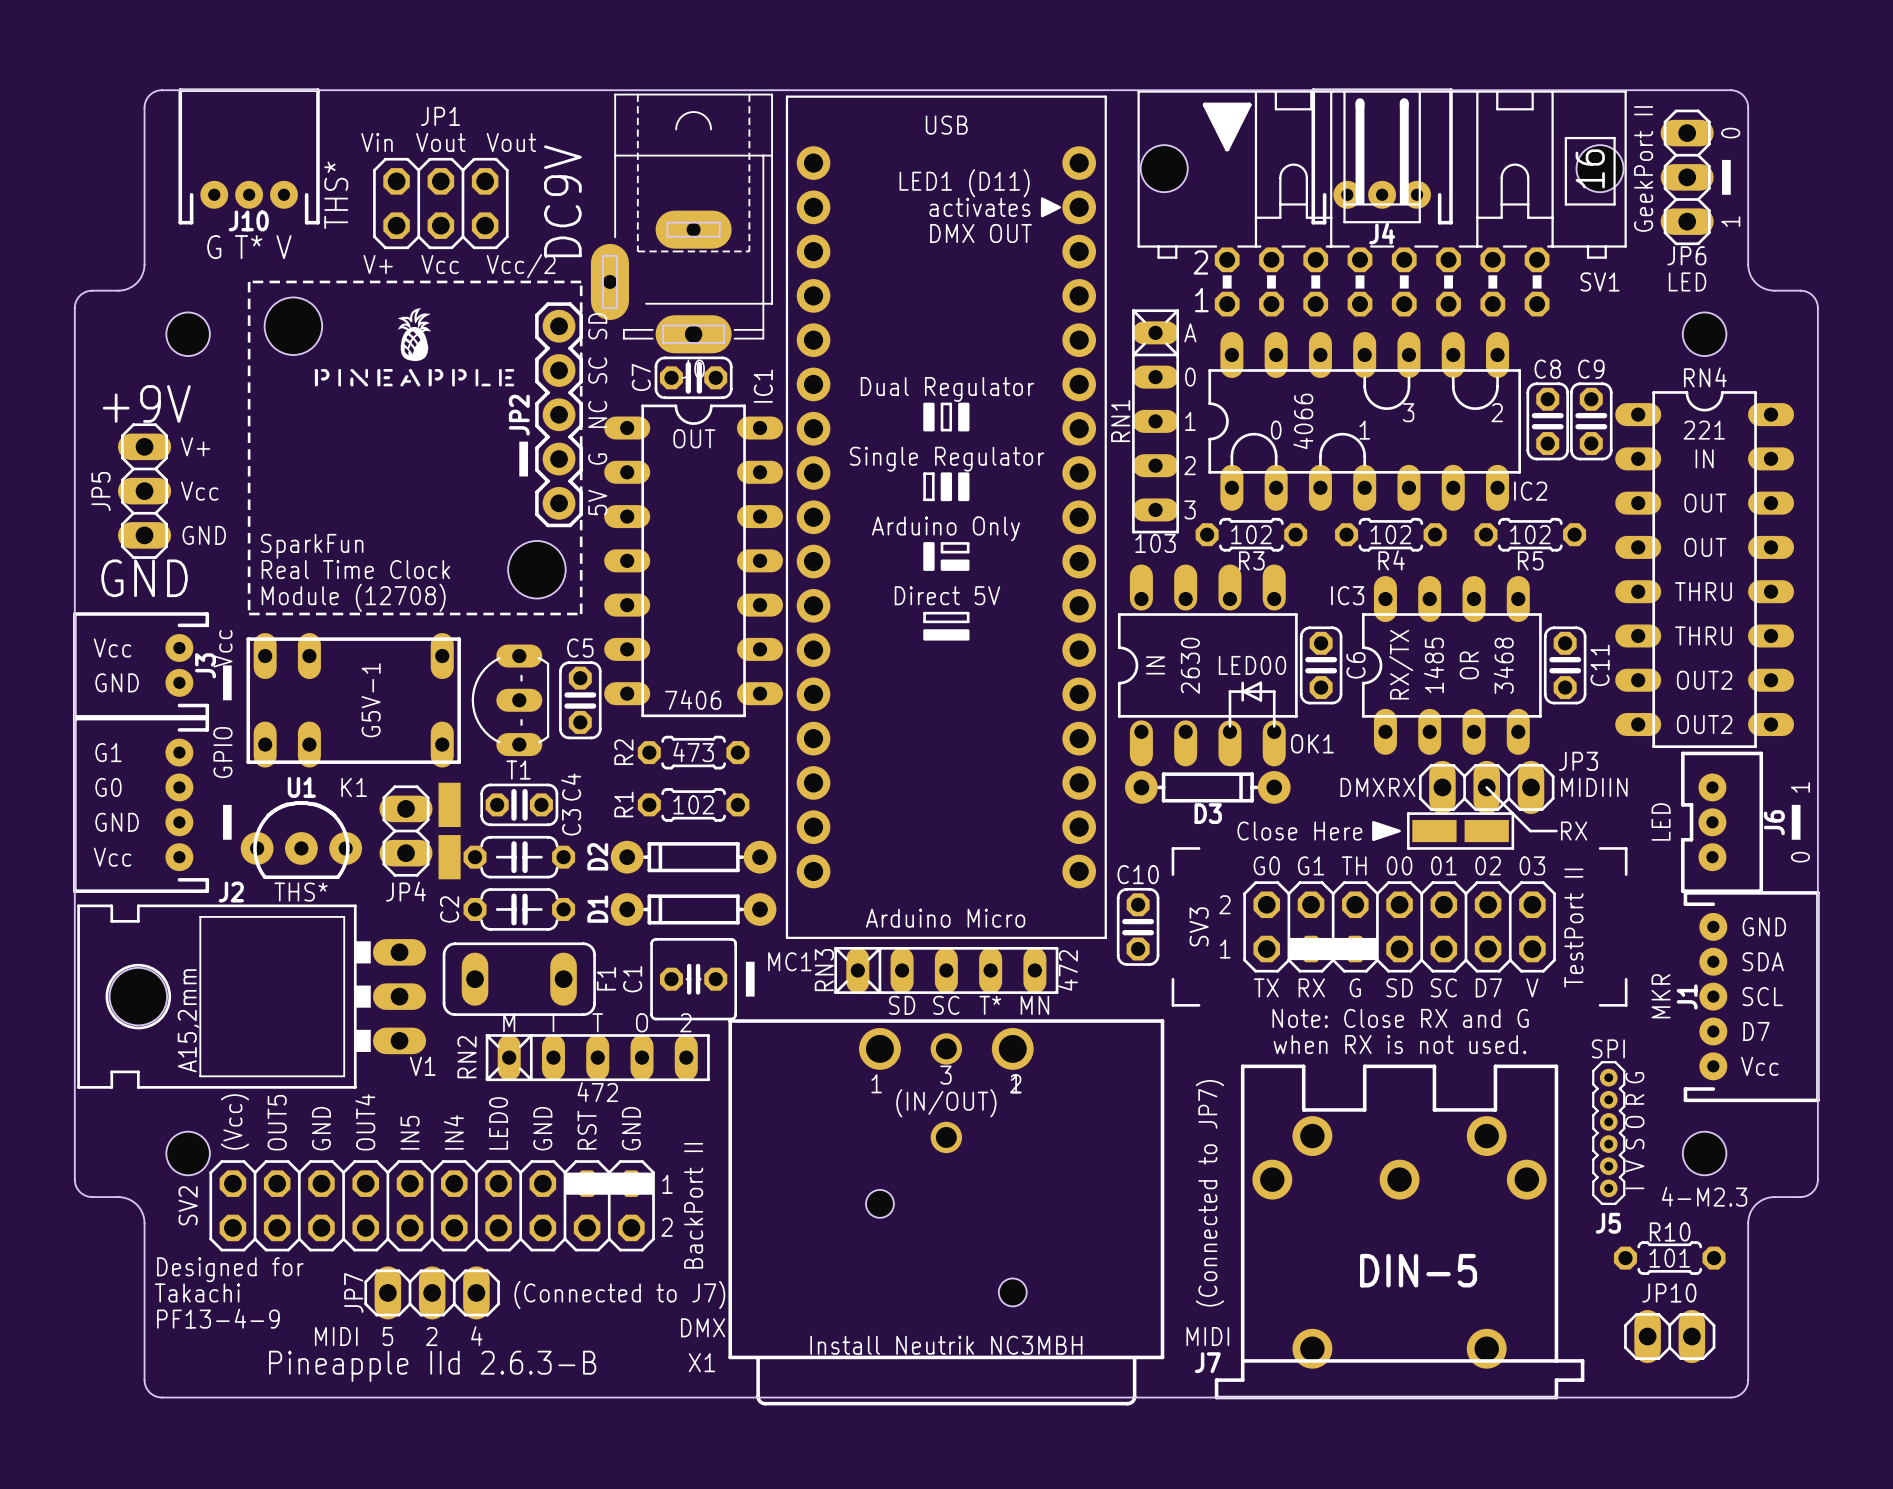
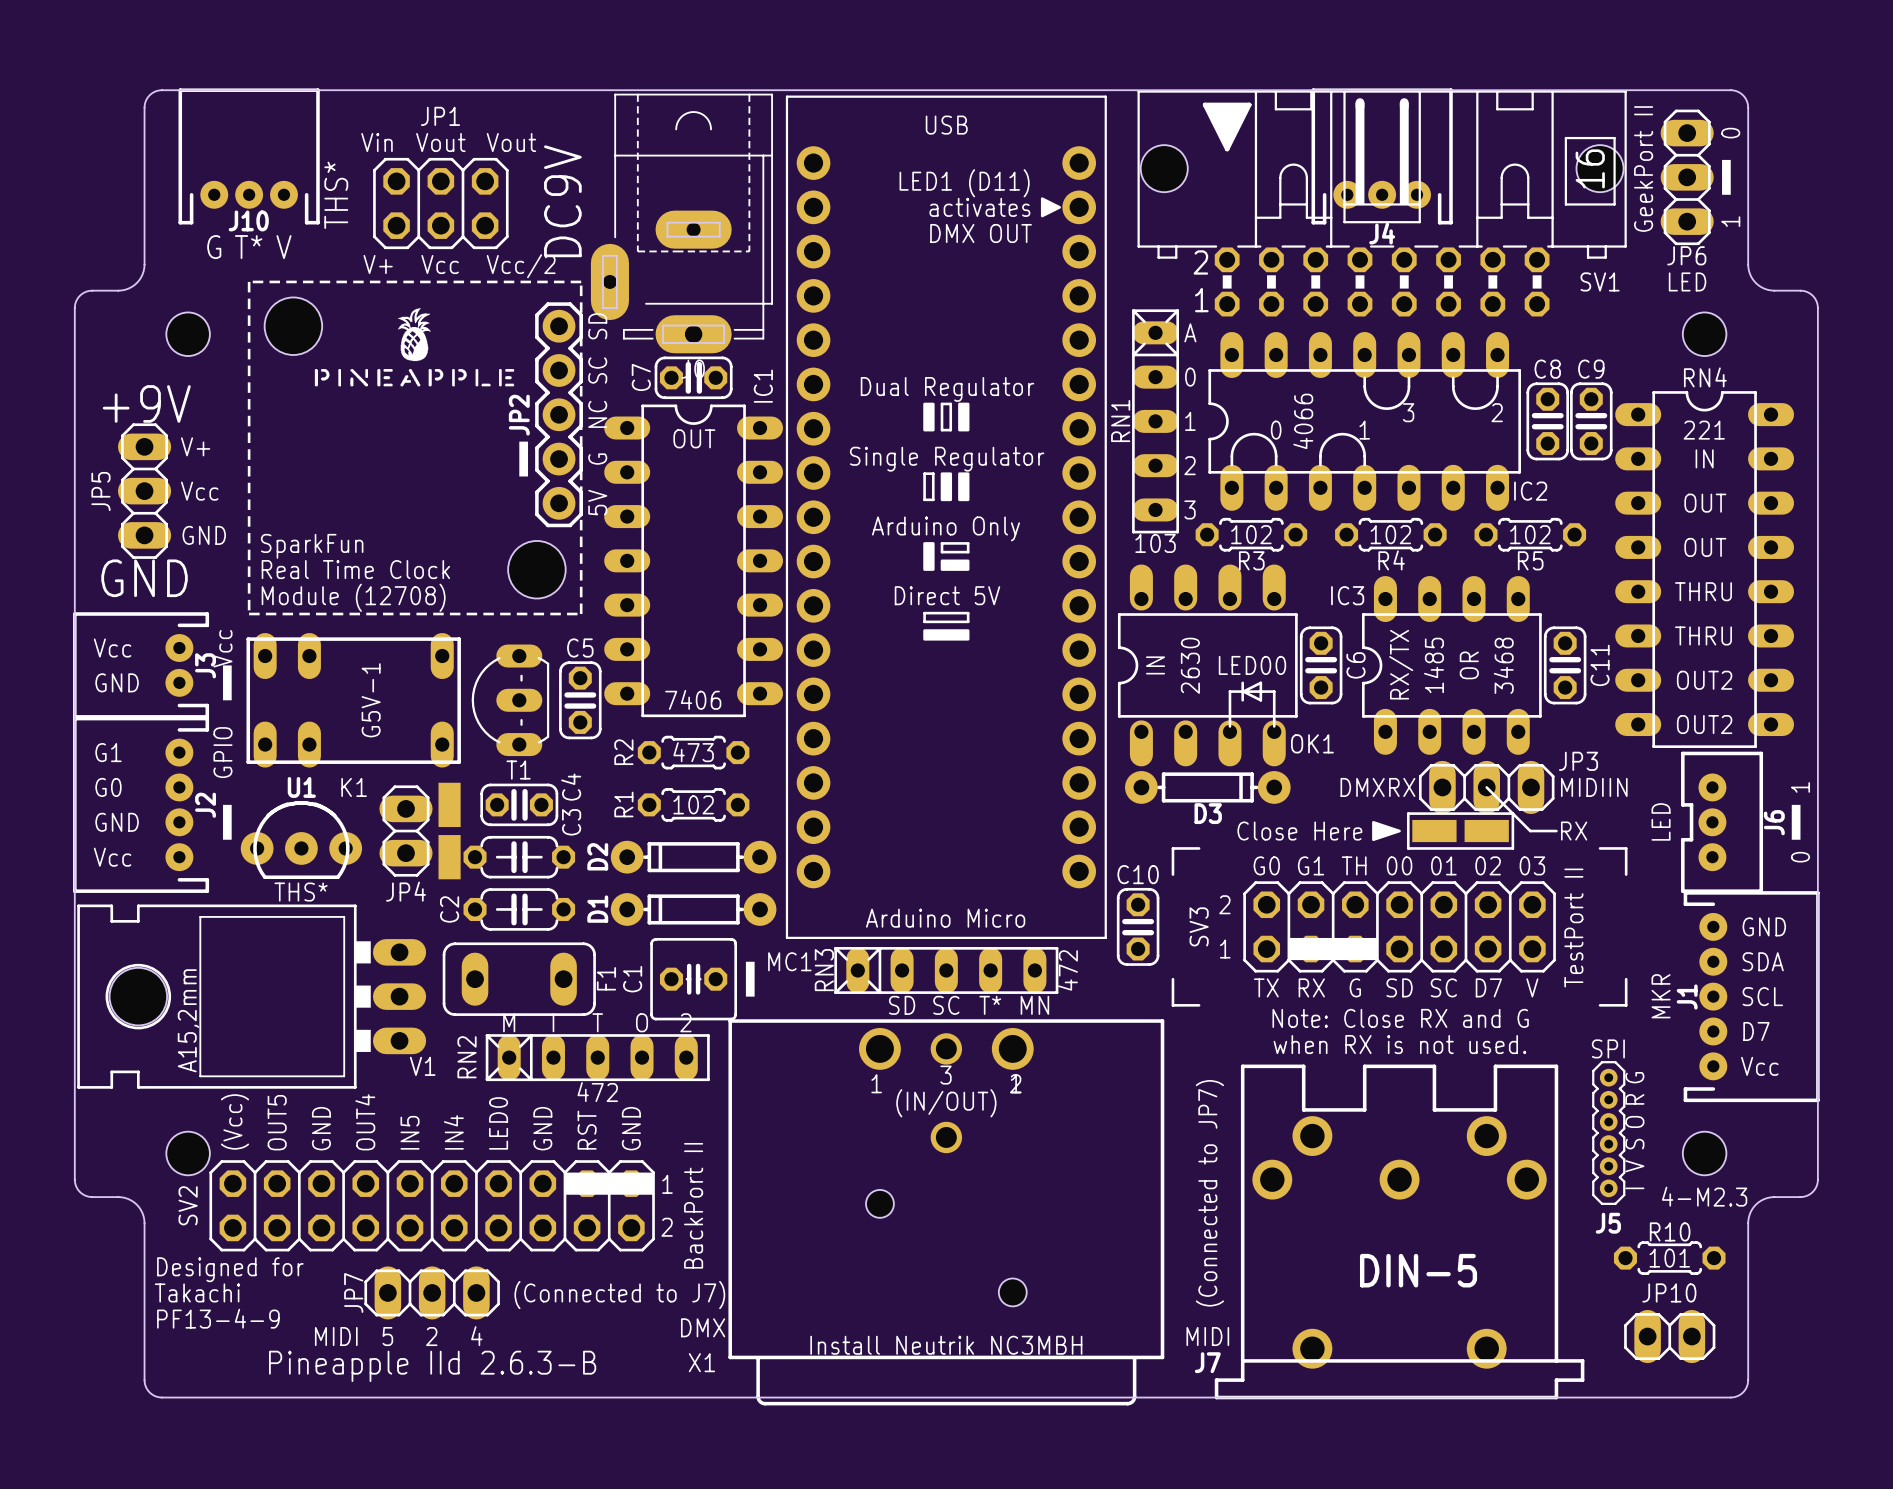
J2 name rotation: 0° (231, 892) -> 90° counterclockwise (205, 805)
J2 name position: J2 (231, 892) -> J2 (205, 805)

